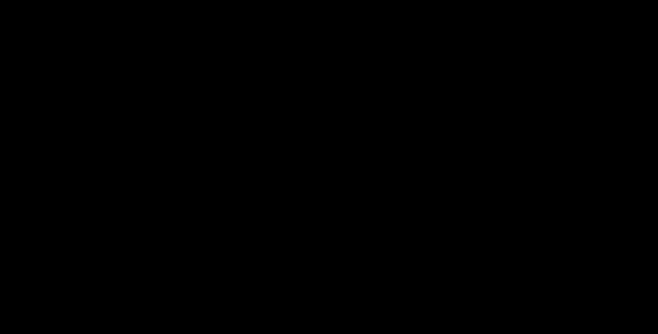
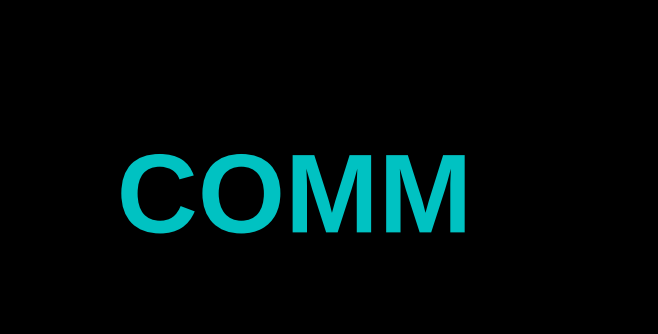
text: none -> COMM (292, 193)

